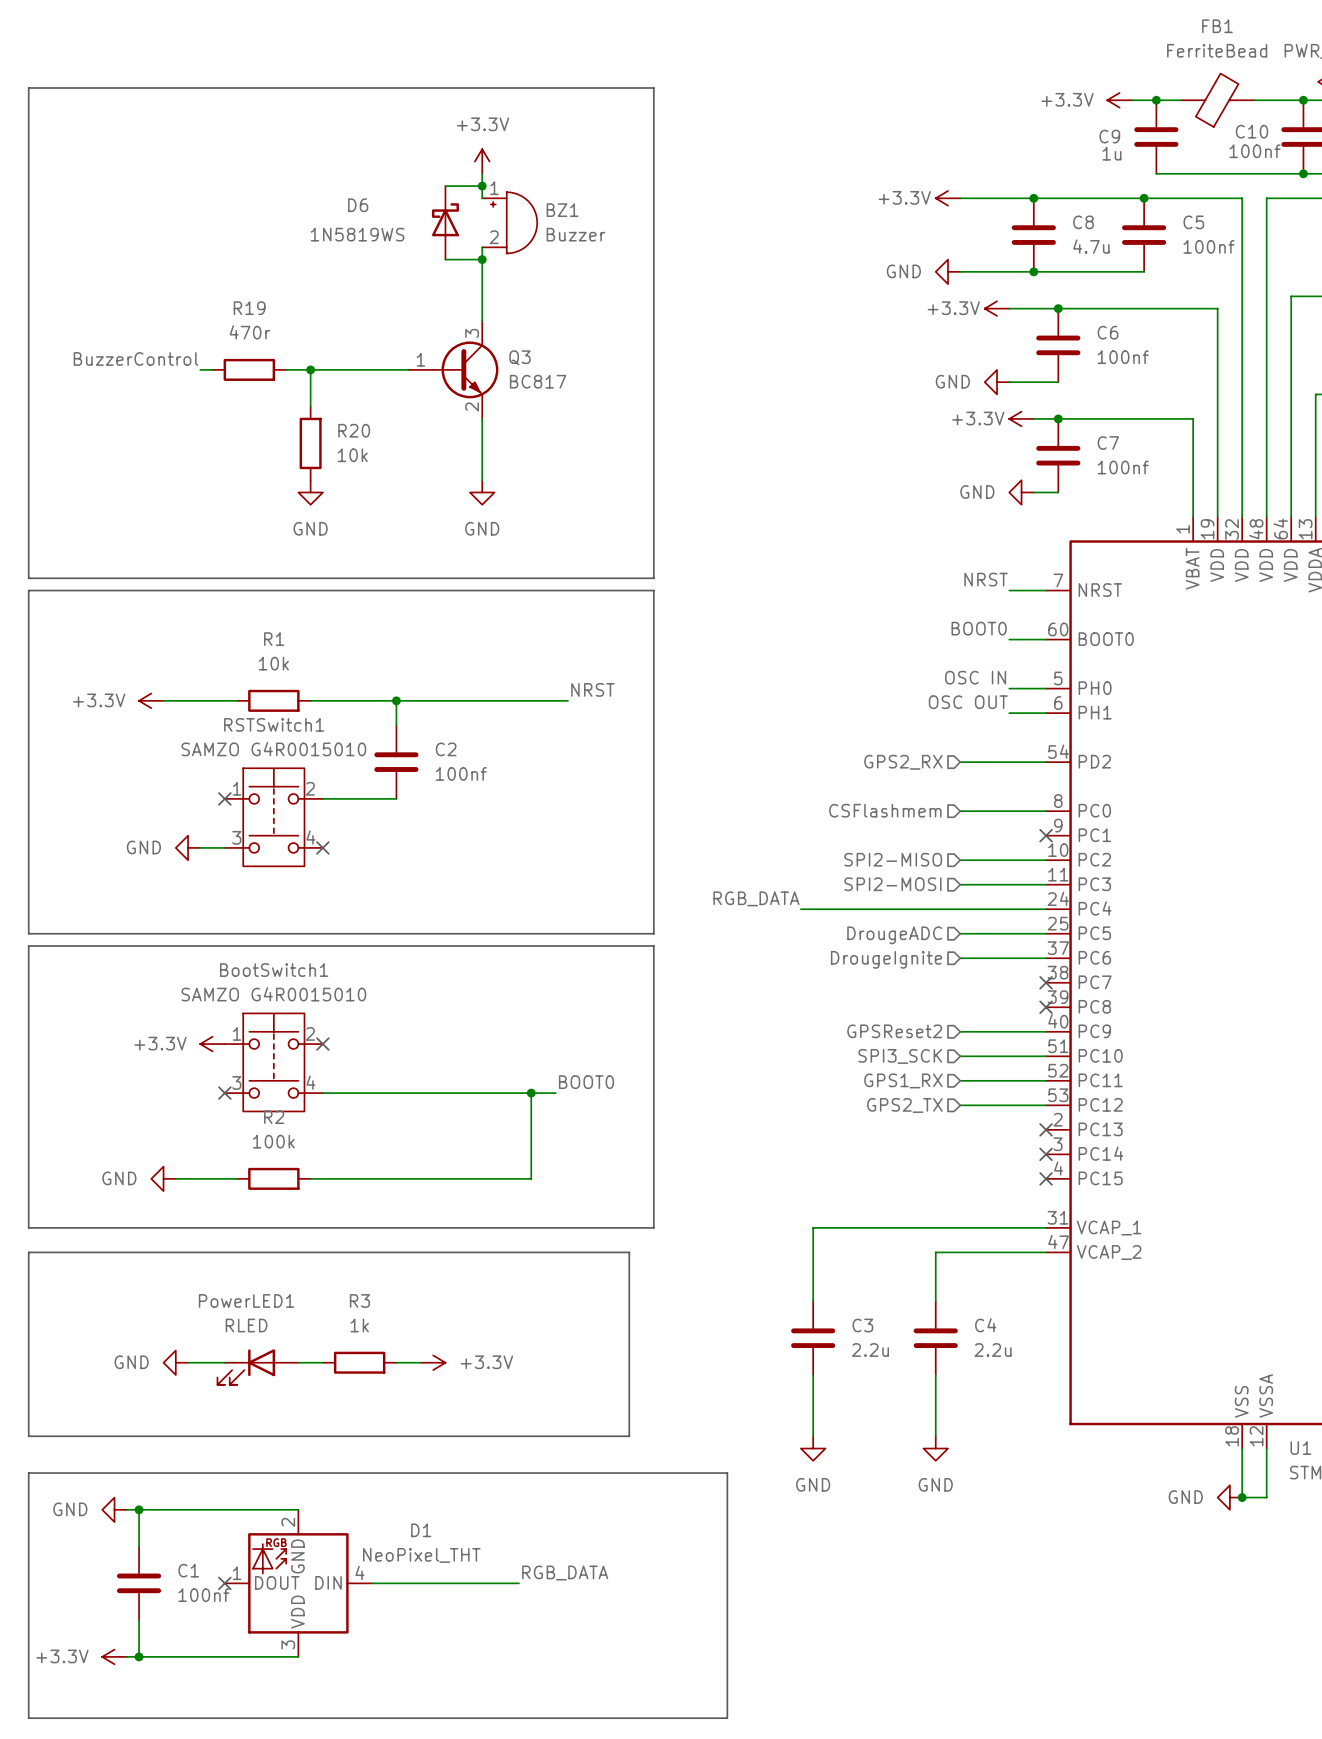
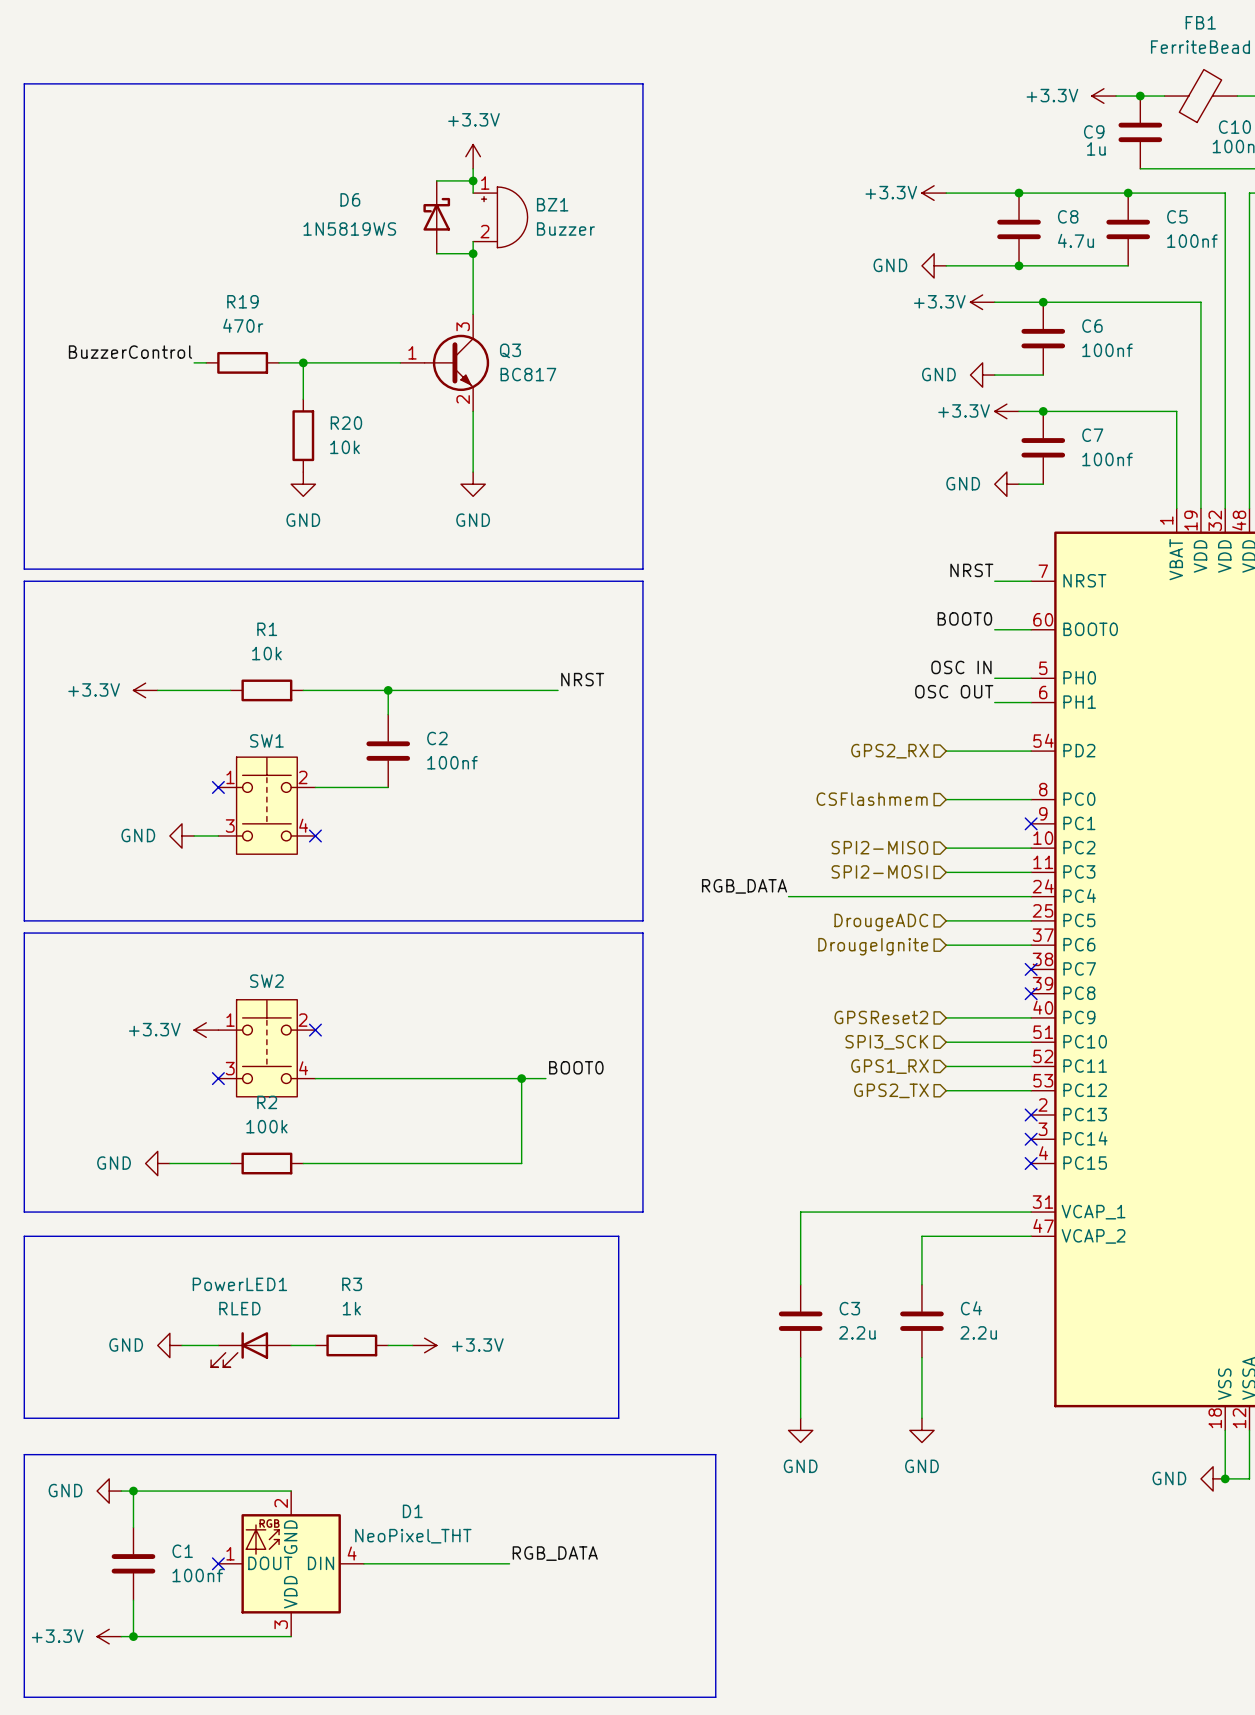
RSTSwitch1 name: RSTSwitch1 (274, 724) -> SW1 (266, 740)
RSTSwitch1 value: SAMZO G4R0015010 (273, 749) -> none
BootSwitch1 name: BootSwitch1 (274, 970) -> SW2 (266, 981)
BootSwitch1 value: SAMZO G4R0015010 (273, 994) -> none

